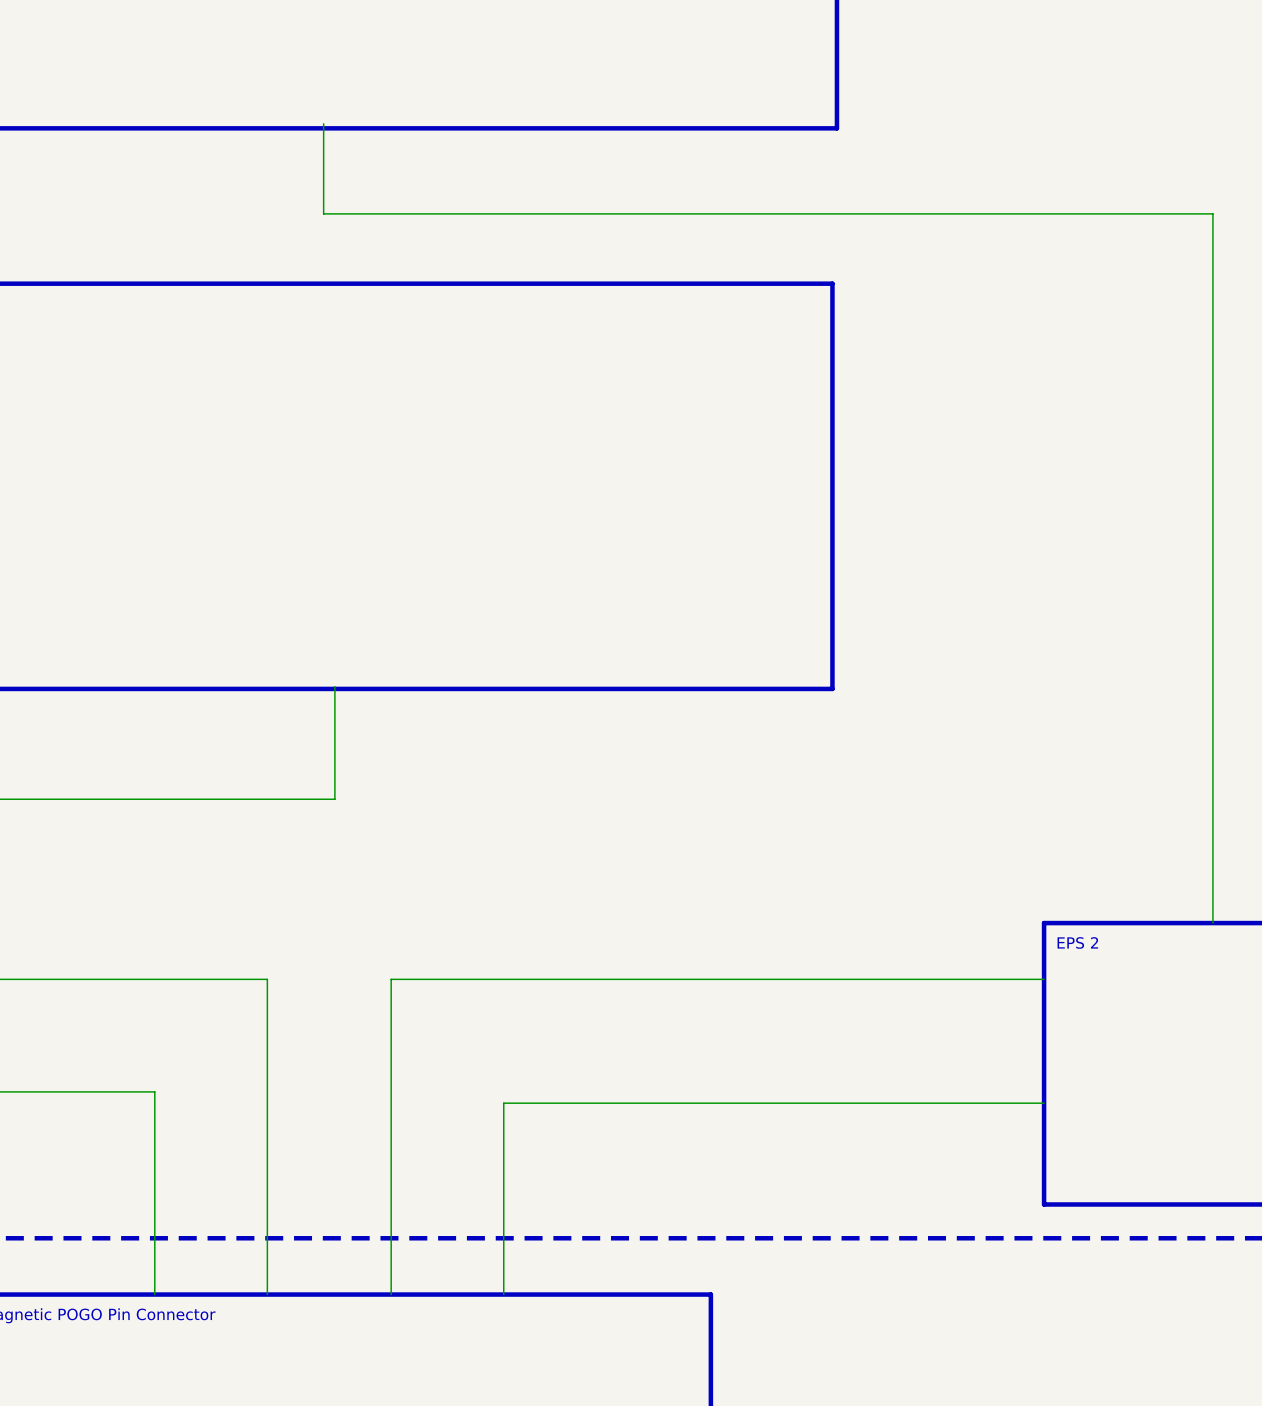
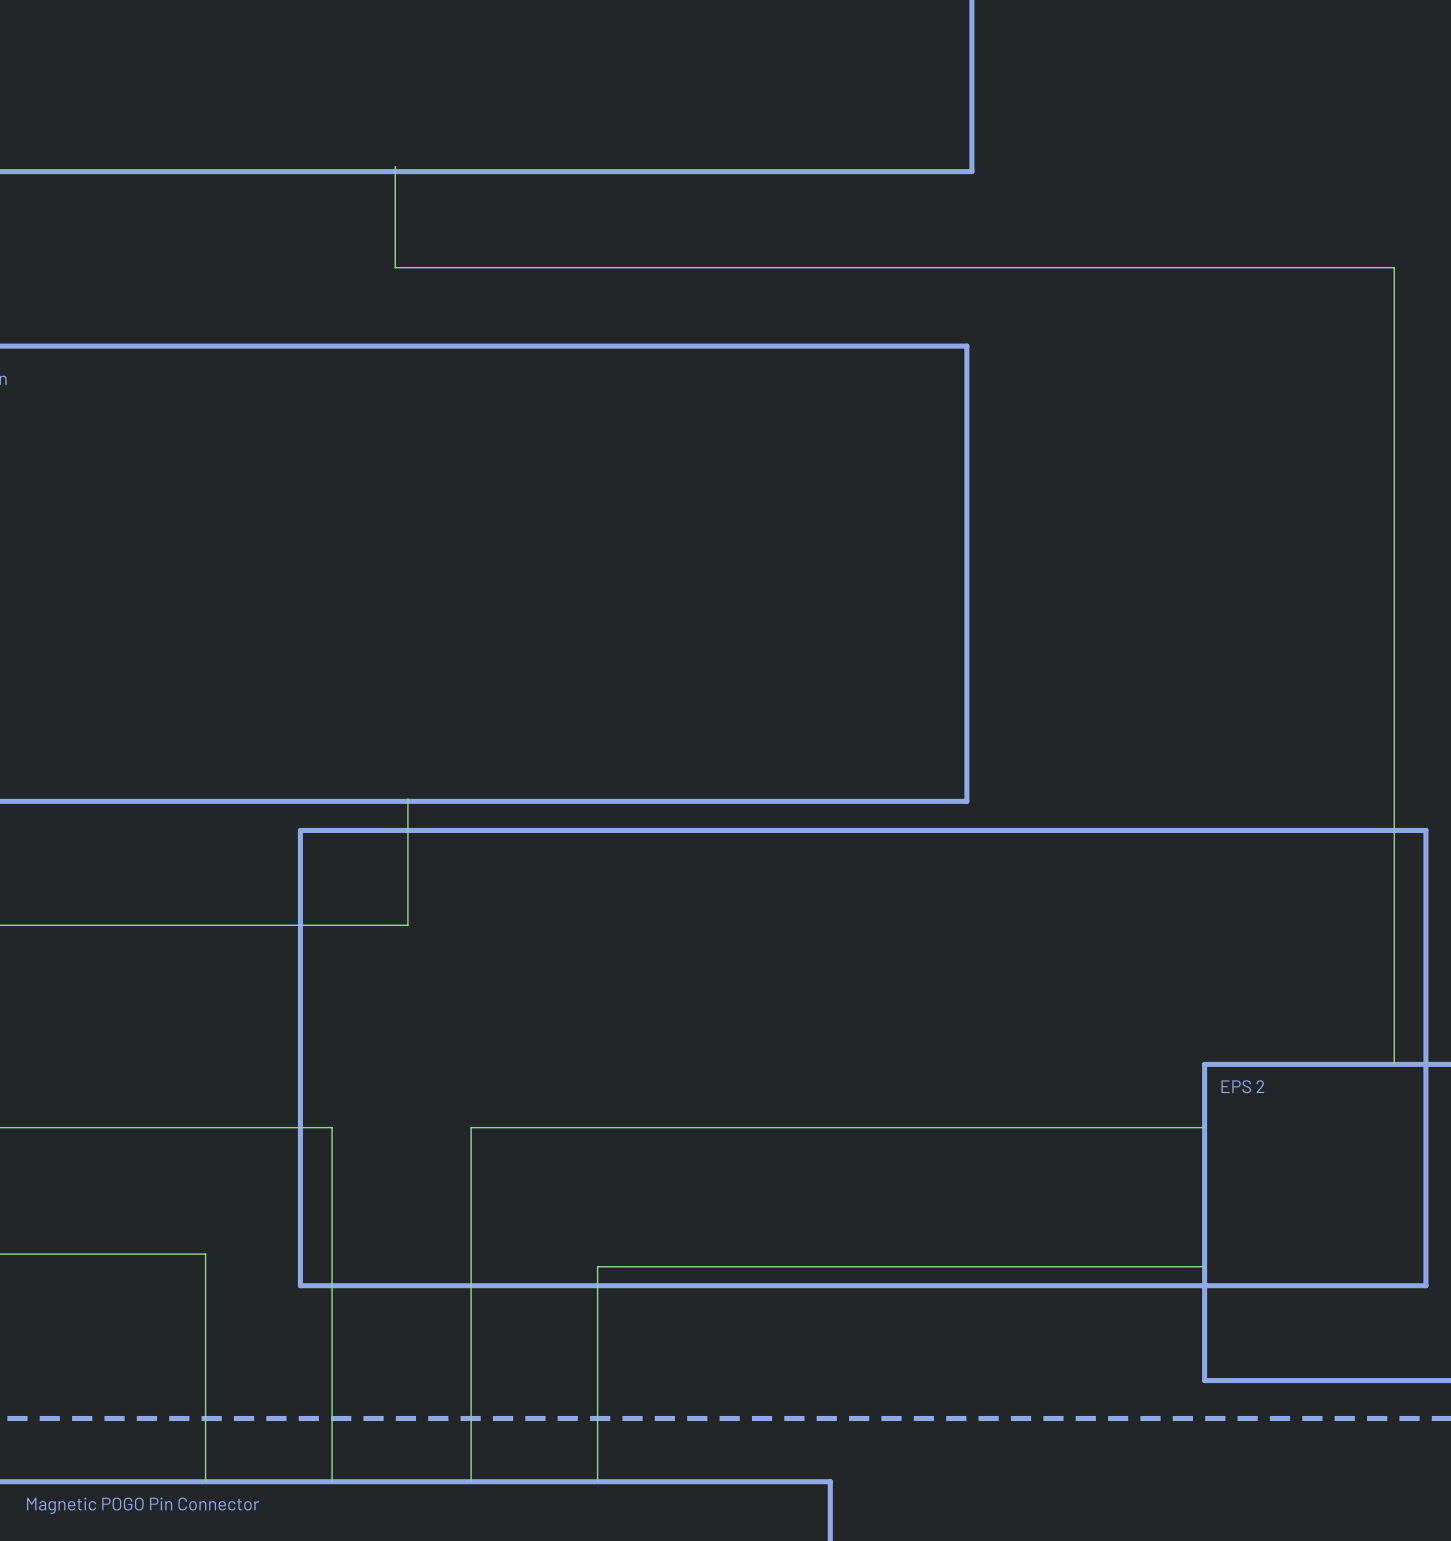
line: none -> (300, 830) (1425, 830) (1425, 1285) (300, 1285) (300, 830)

